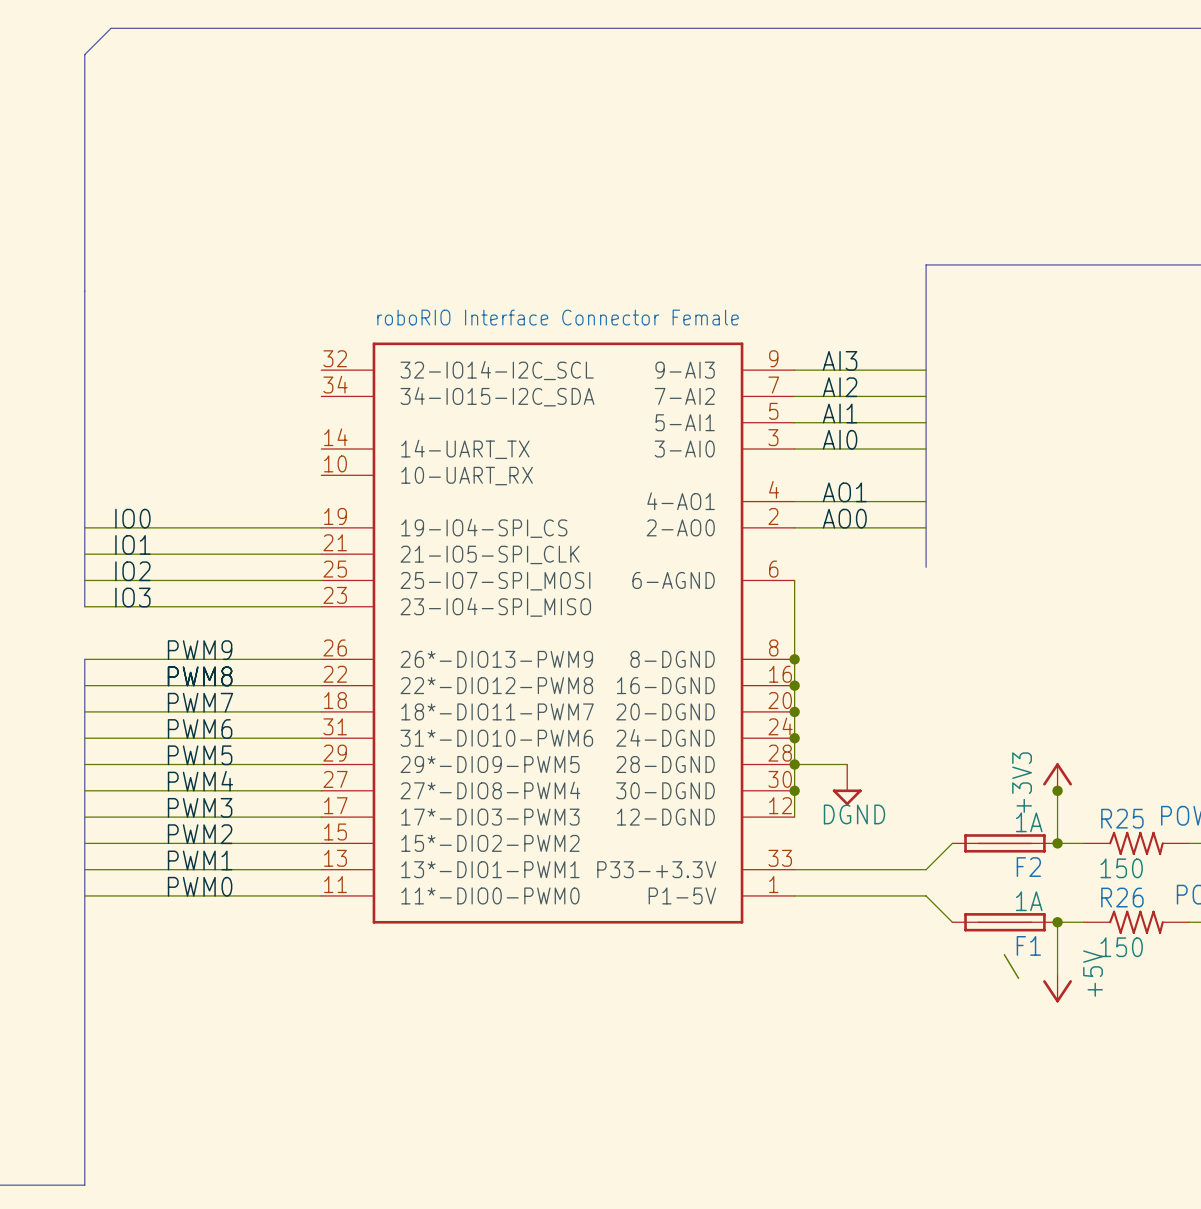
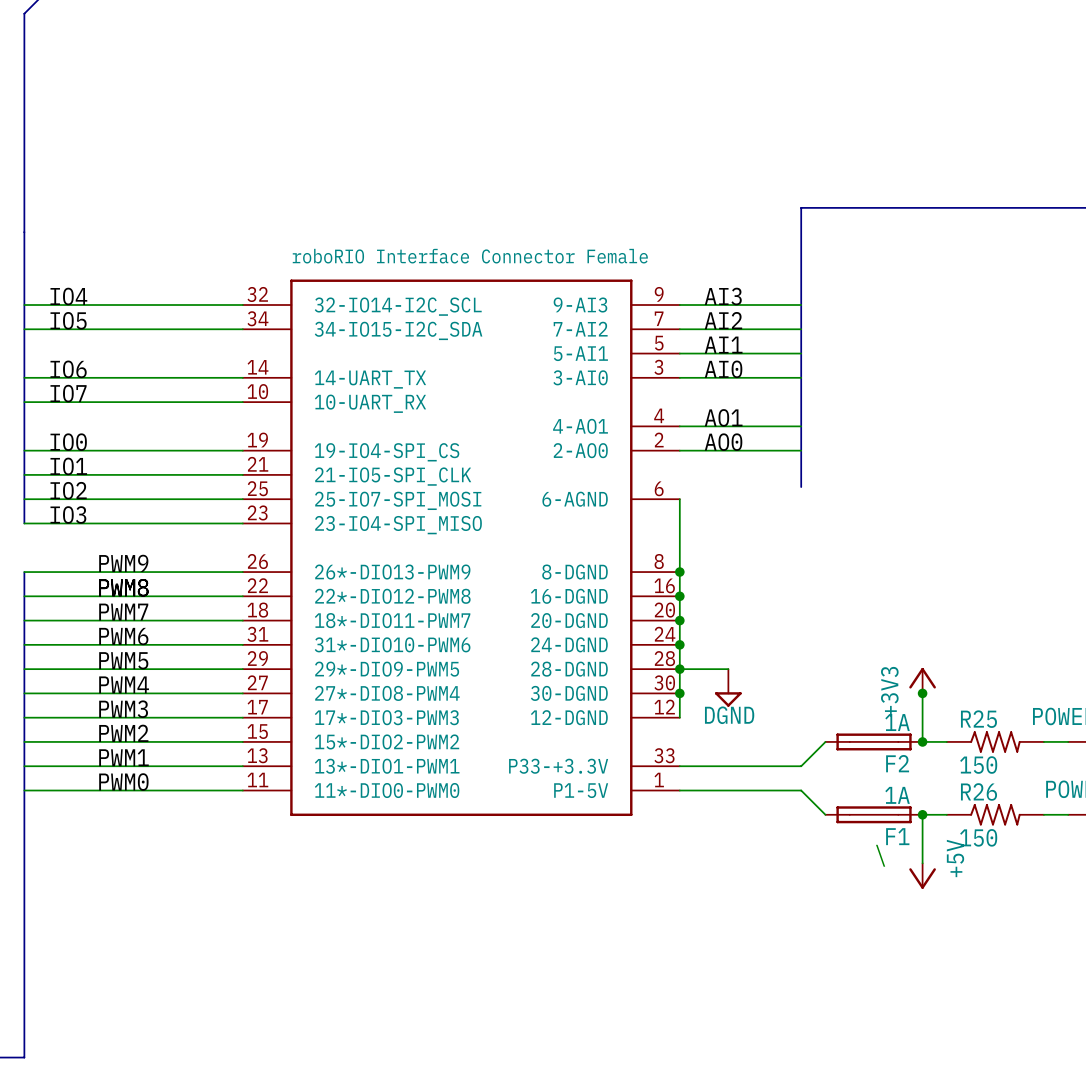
label: none -> IO4 (68, 296)
wire: none -> (24, 305) (242, 305)
label: none -> IO5 (68, 320)
wire: none -> (24, 329) (242, 329)
label: none -> IO6 (68, 369)
wire: none -> (24, 377) (242, 377)
label: none -> IO7 (68, 393)
wire: none -> (24, 402) (242, 402)

